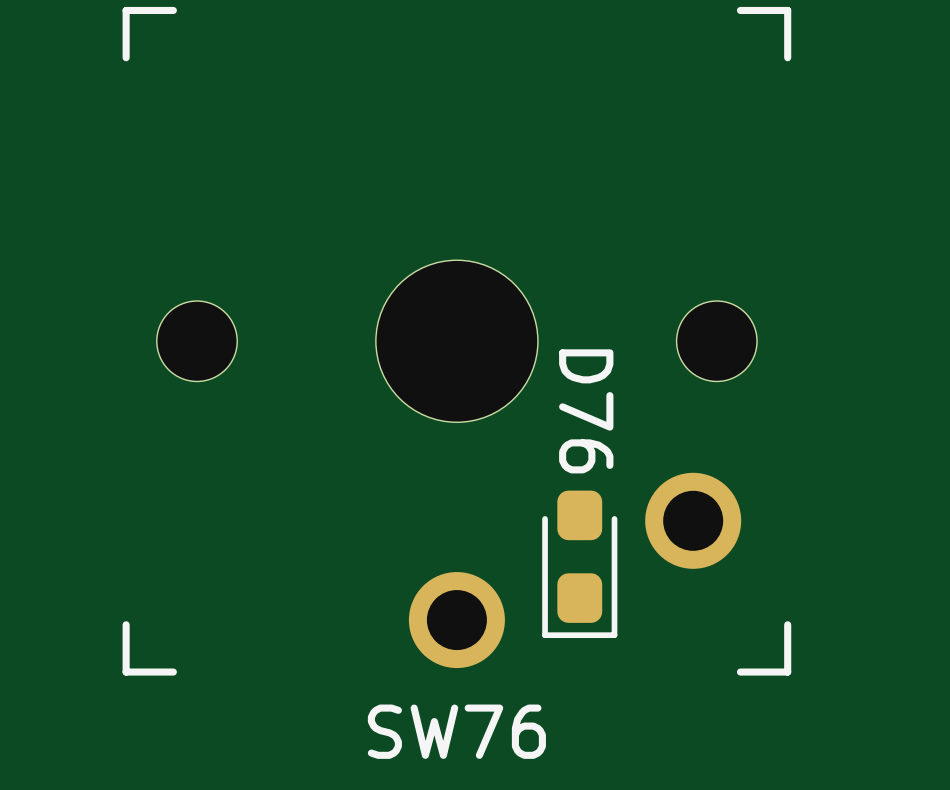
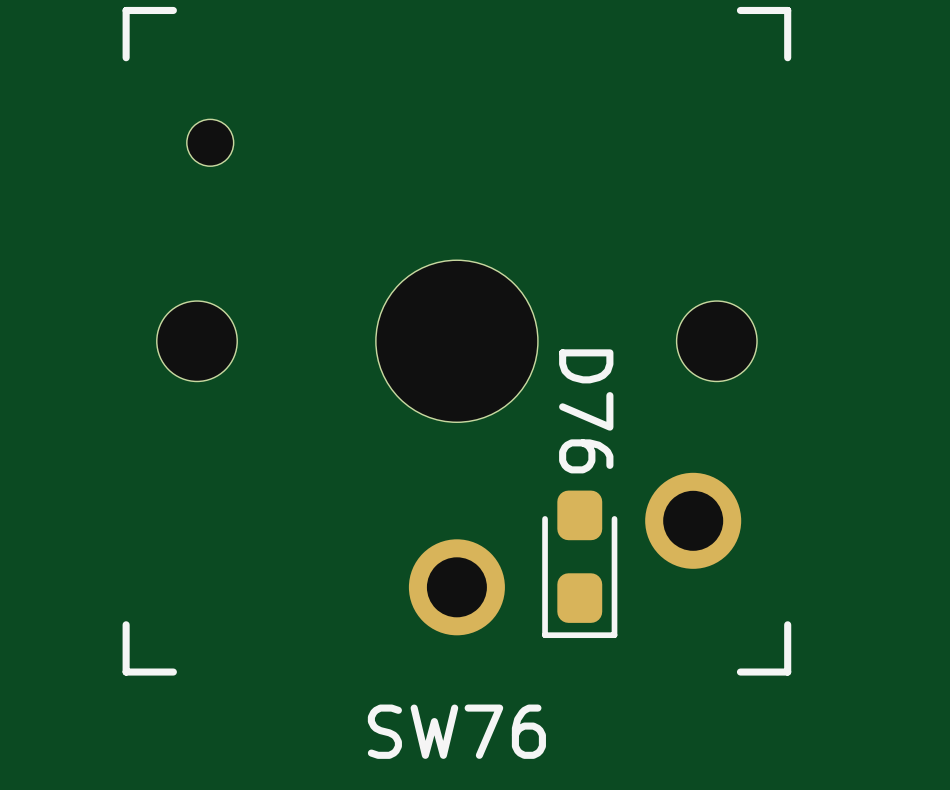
SW76 footprint: [122, 6, 792, 676] -> [122, 6, 792, 676]

